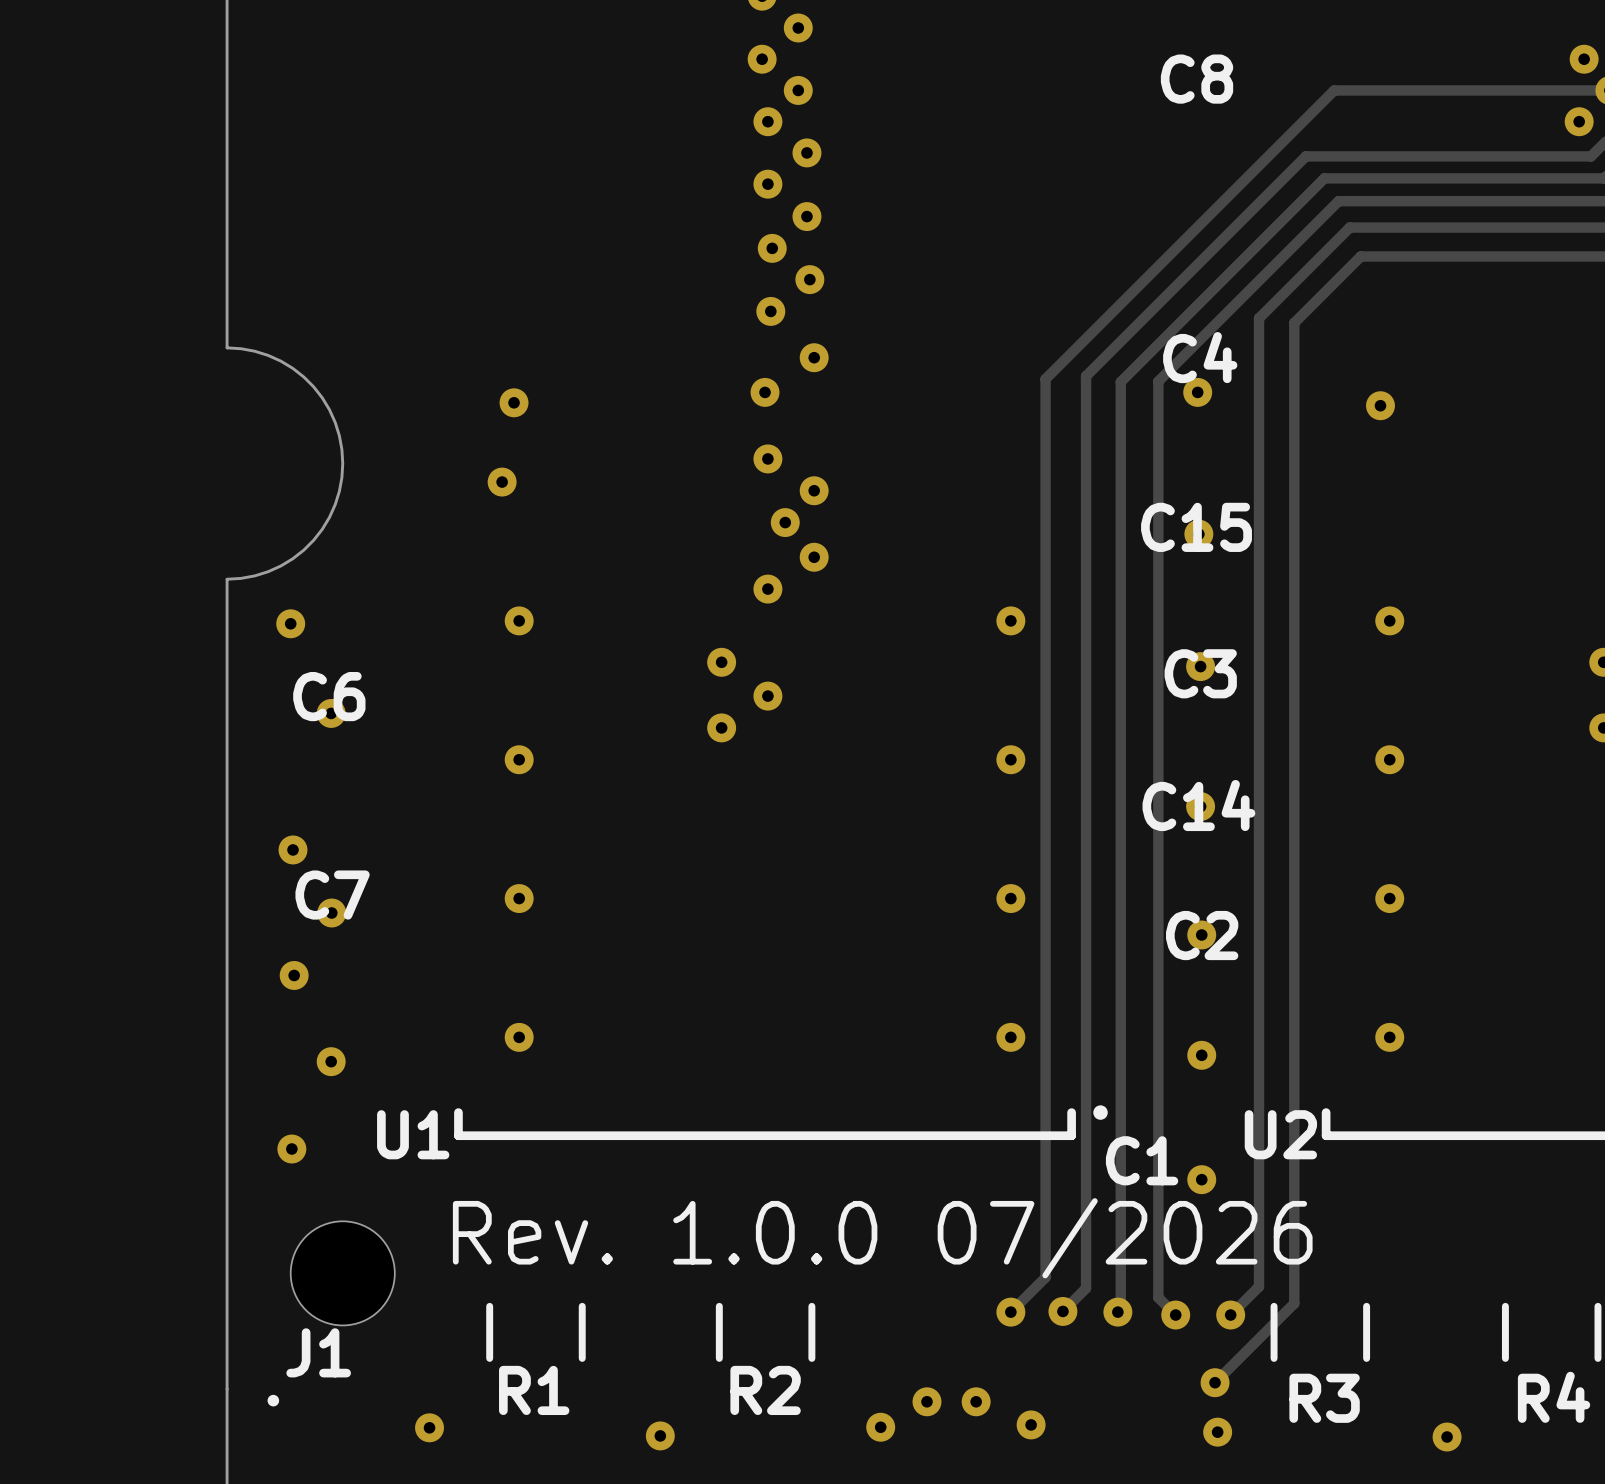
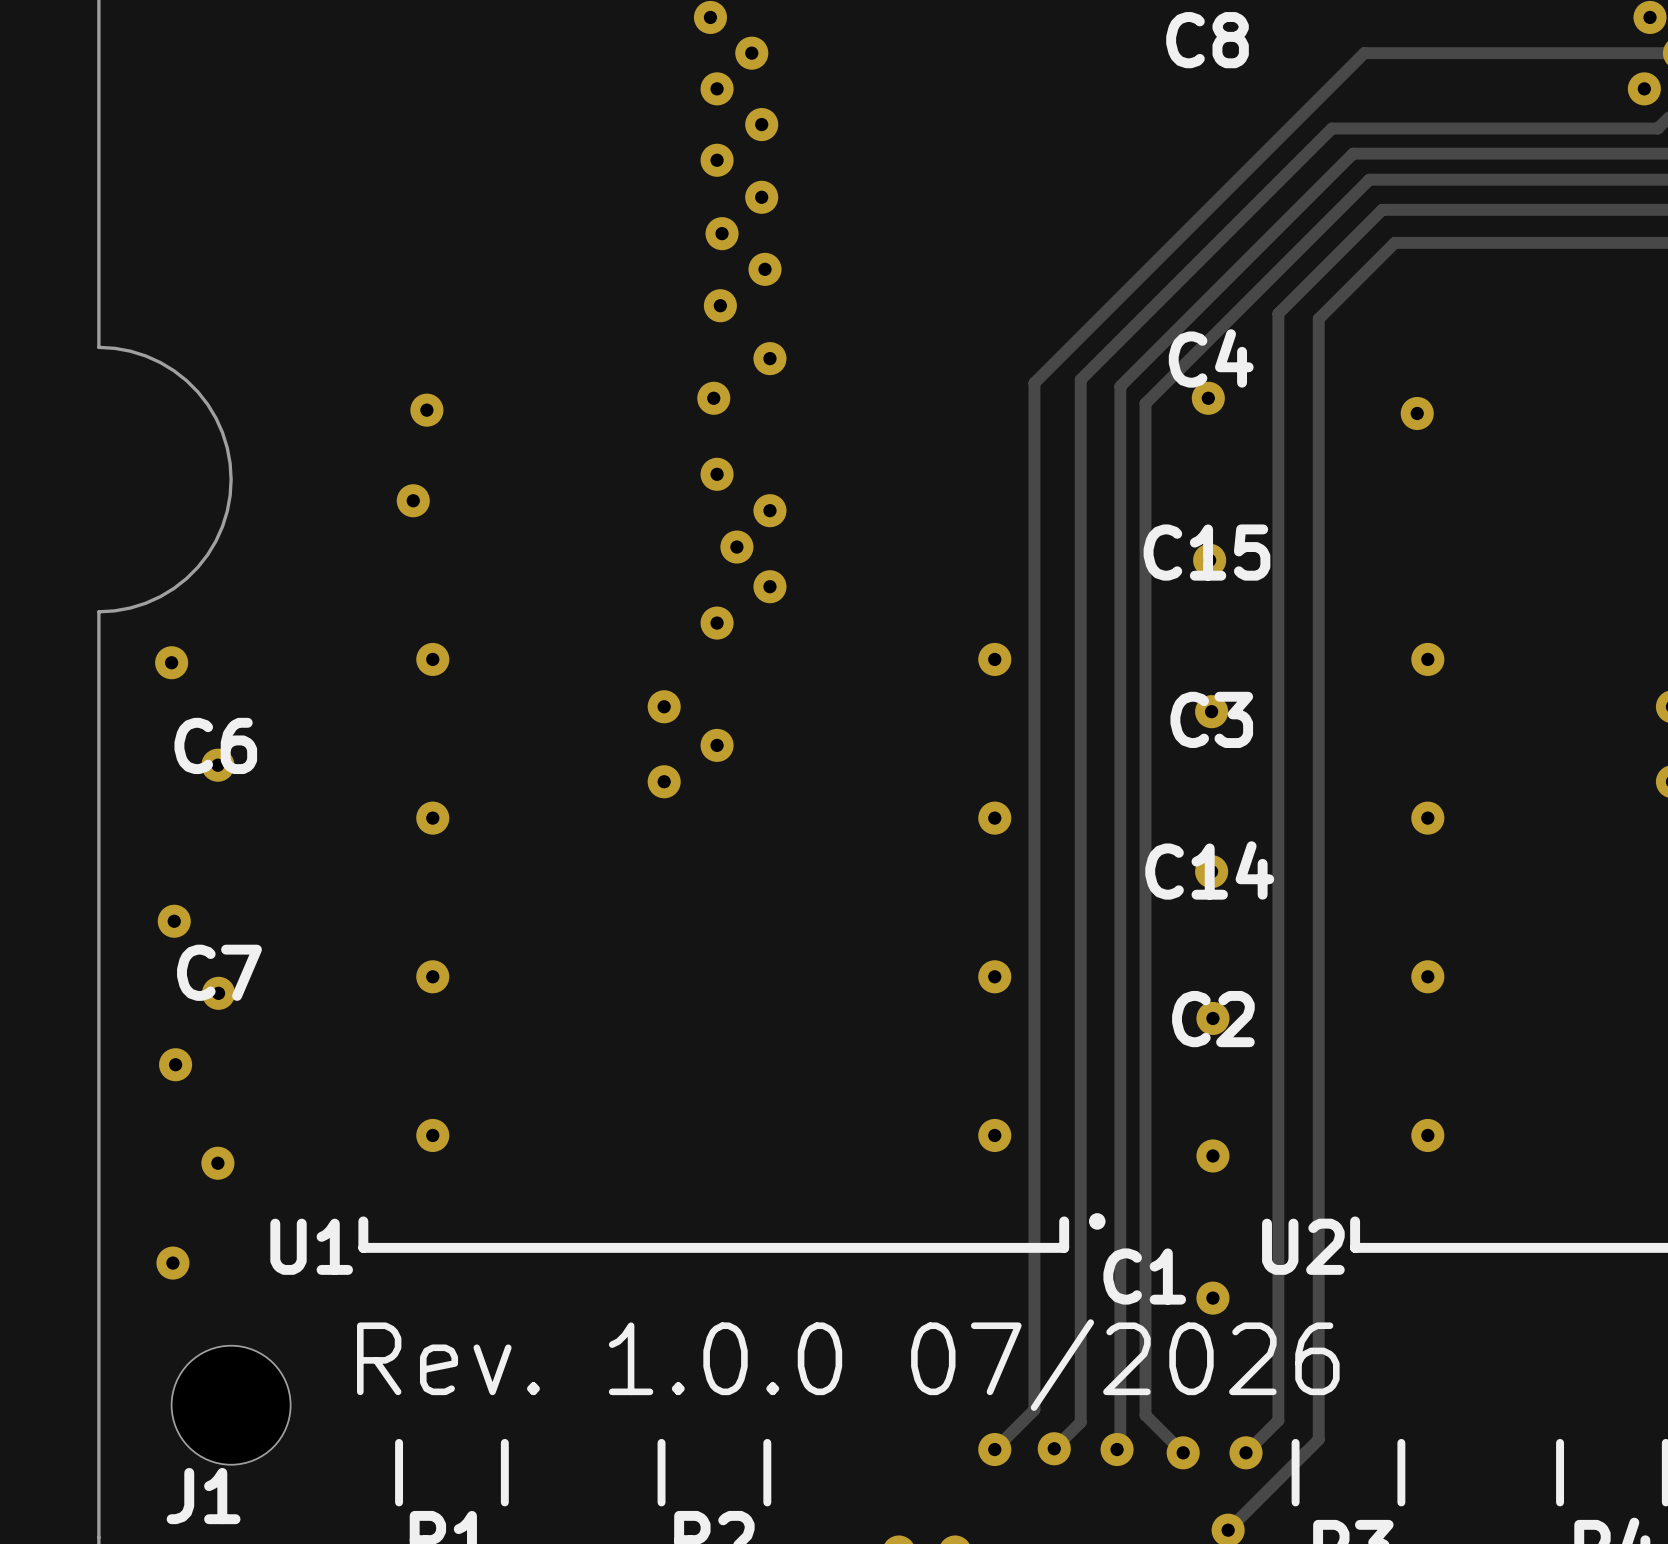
track: (1158, 381) (1158, 1297) -> (1163, 385) (1145, 403) (1145, 1415) (1163, 1432)

